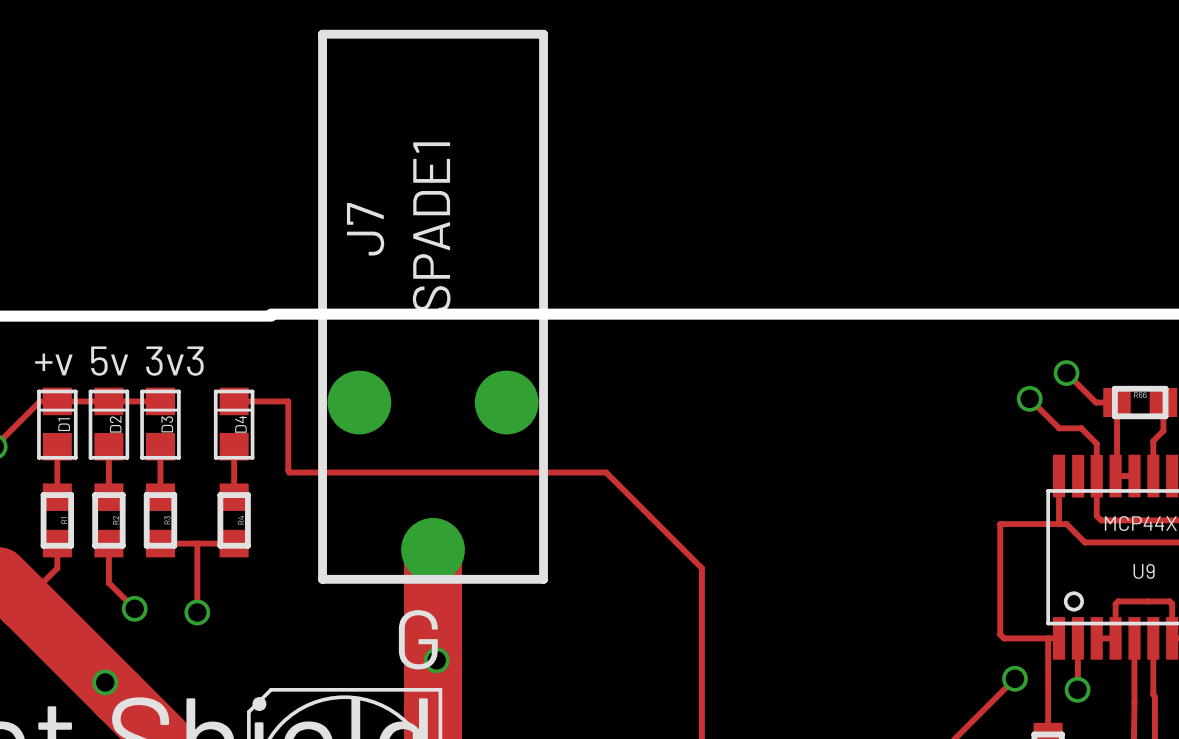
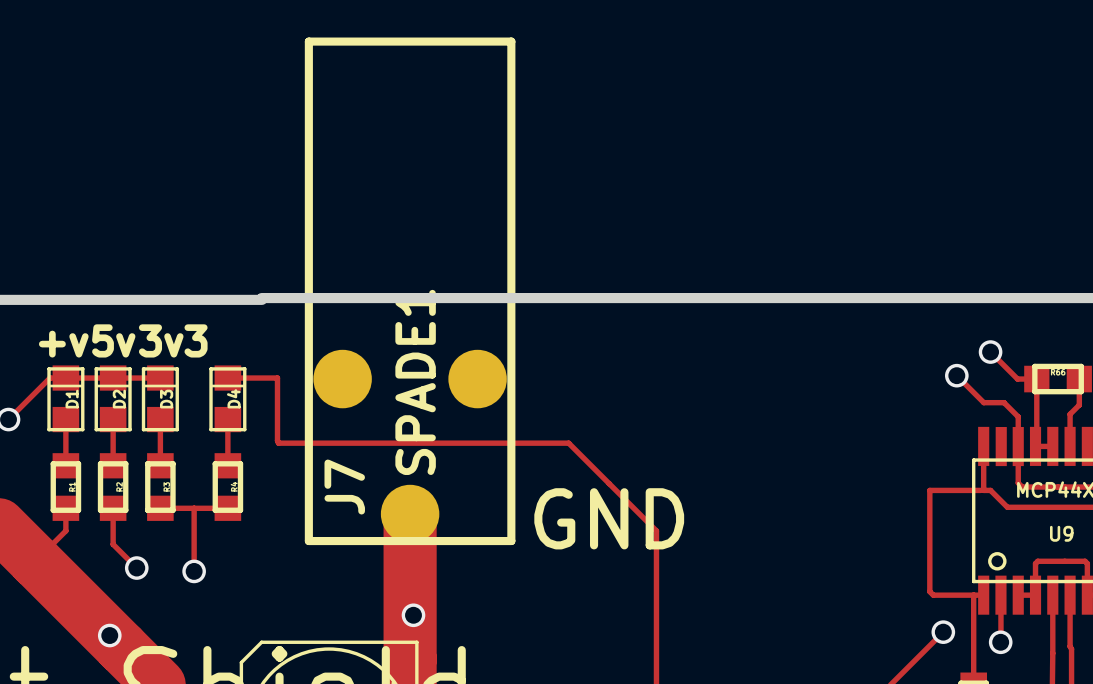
J7 value position: SPADE1 (431, 226) -> SPADE1 (415, 382)
J7 name position: J7 (365, 229) -> J7 (344, 487)
text: none -> GND (609, 518)
text: G (418, 639) -> none

